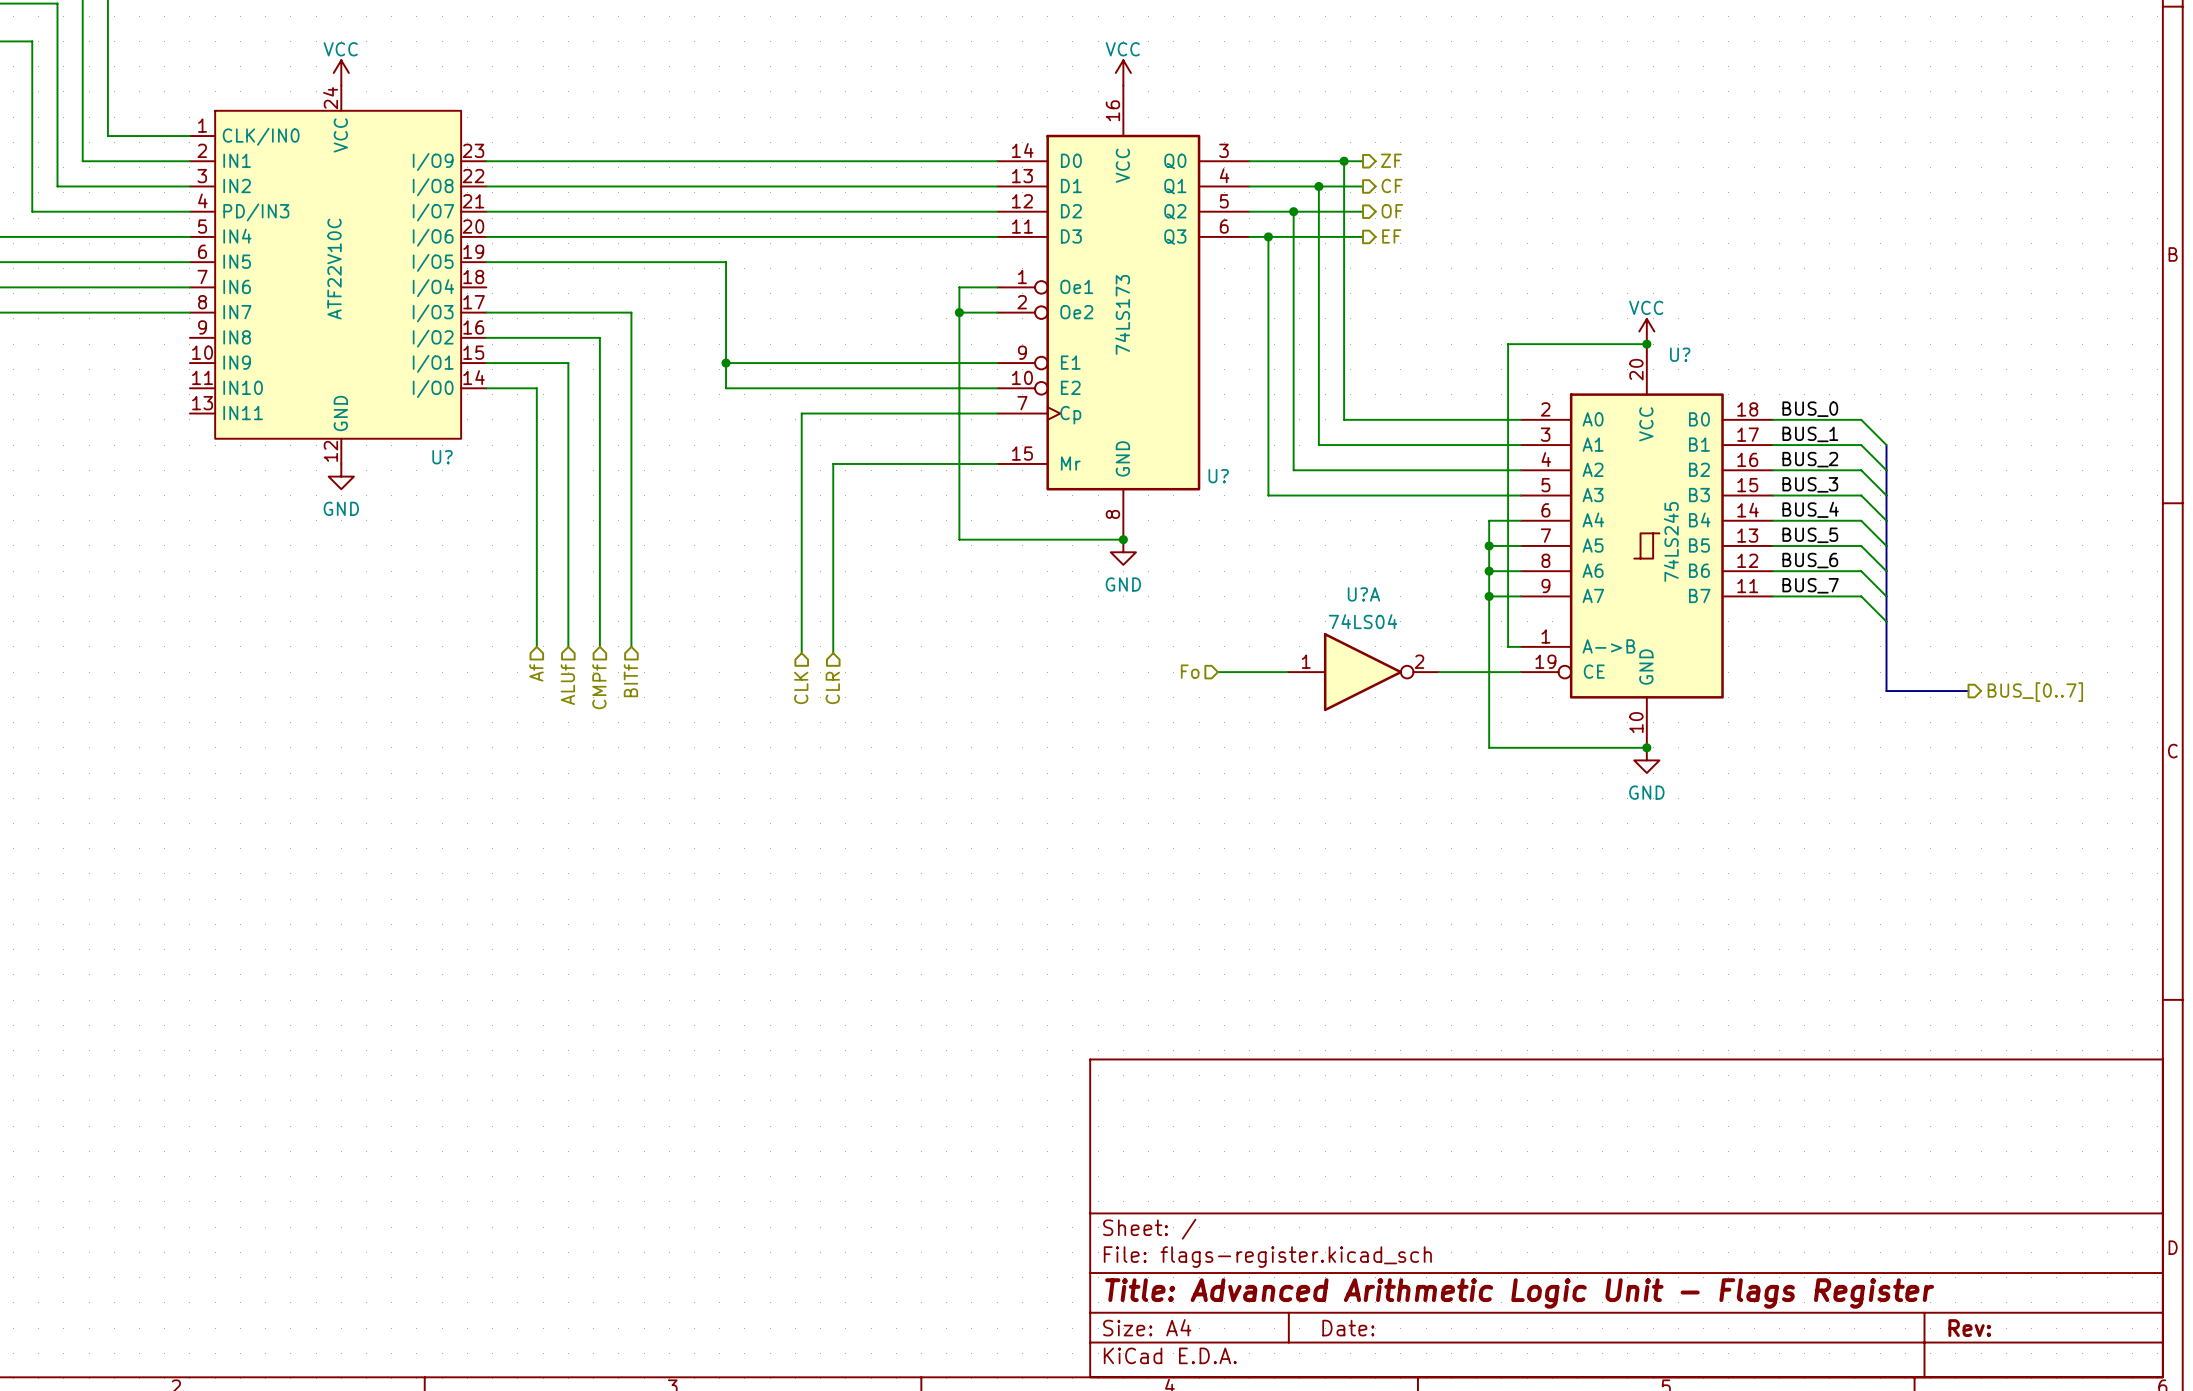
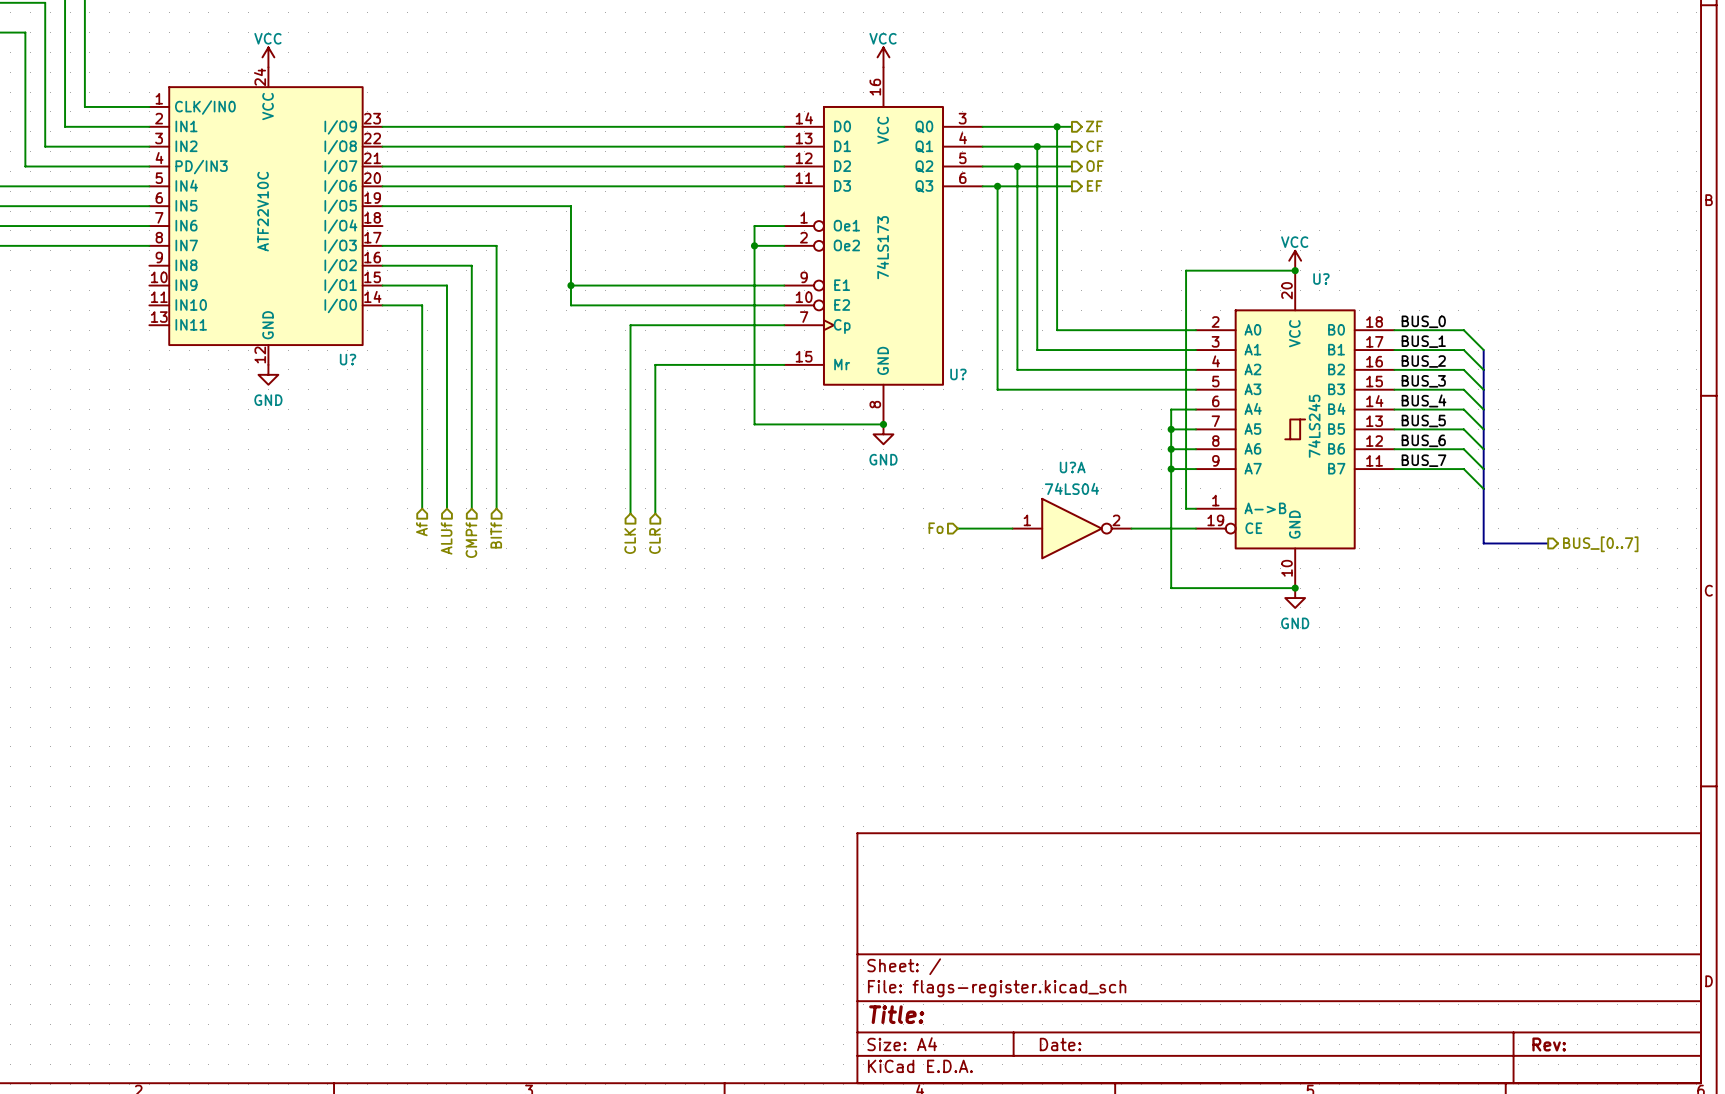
title block: Title: Advanced Arithmetic Logic Unit - Flags Register (1519, 1293) -> Title: (896, 1014)

